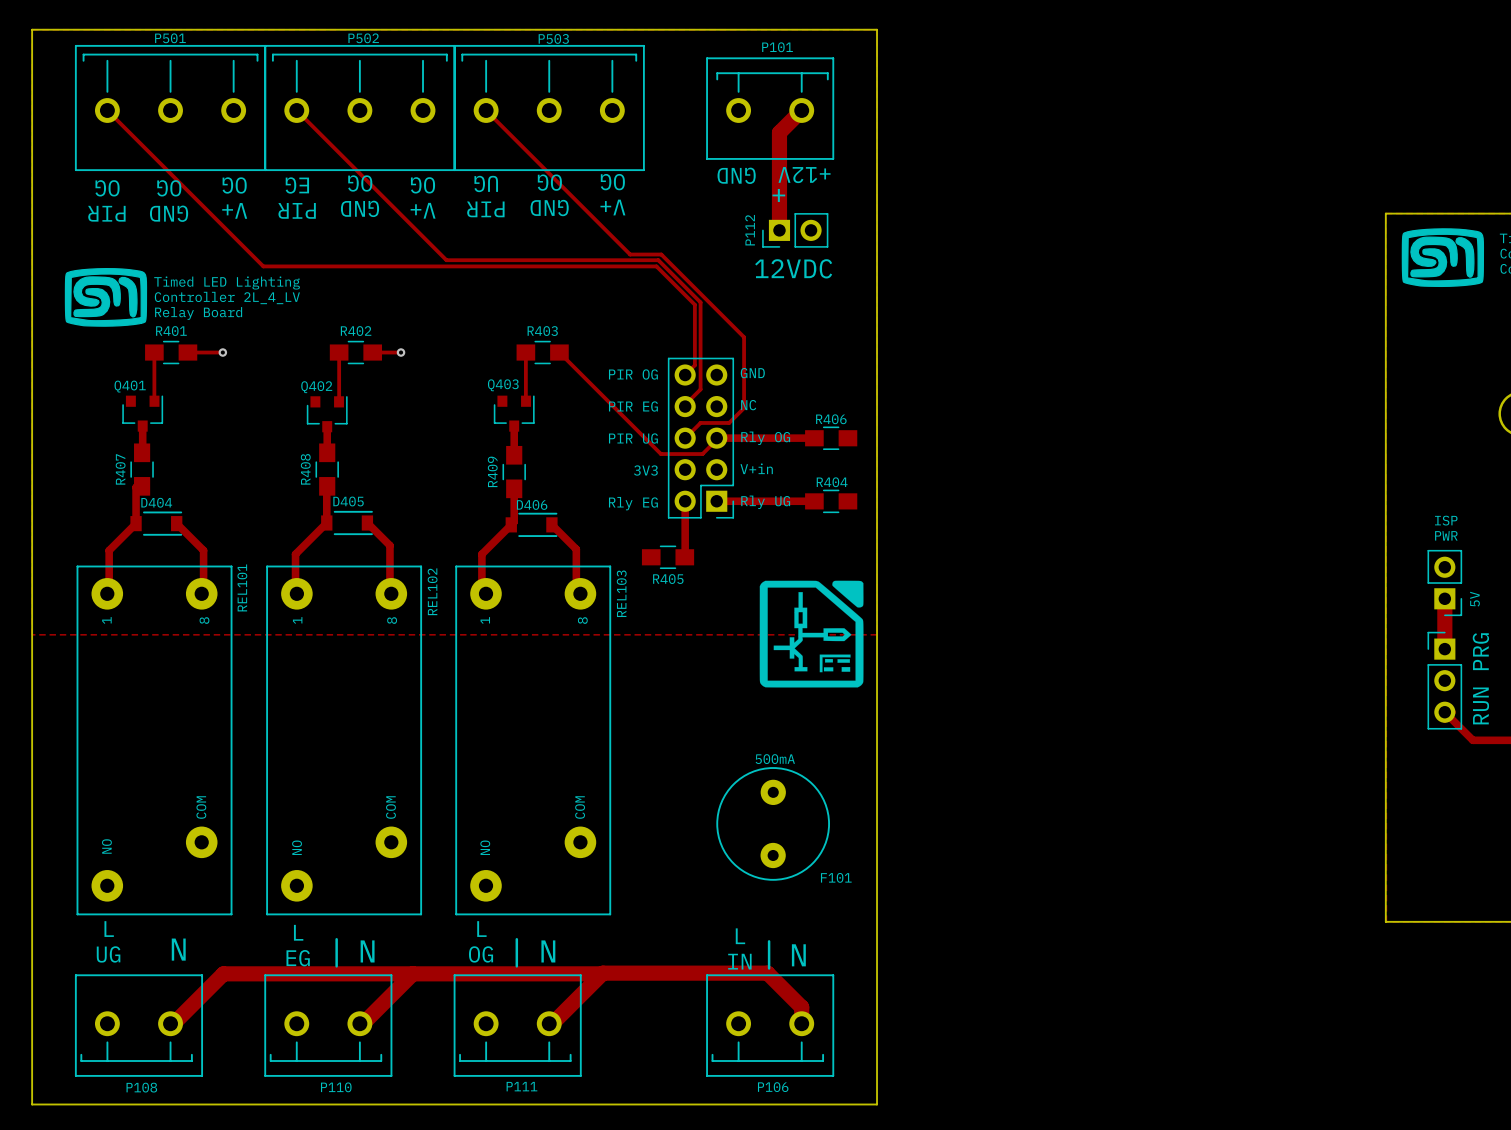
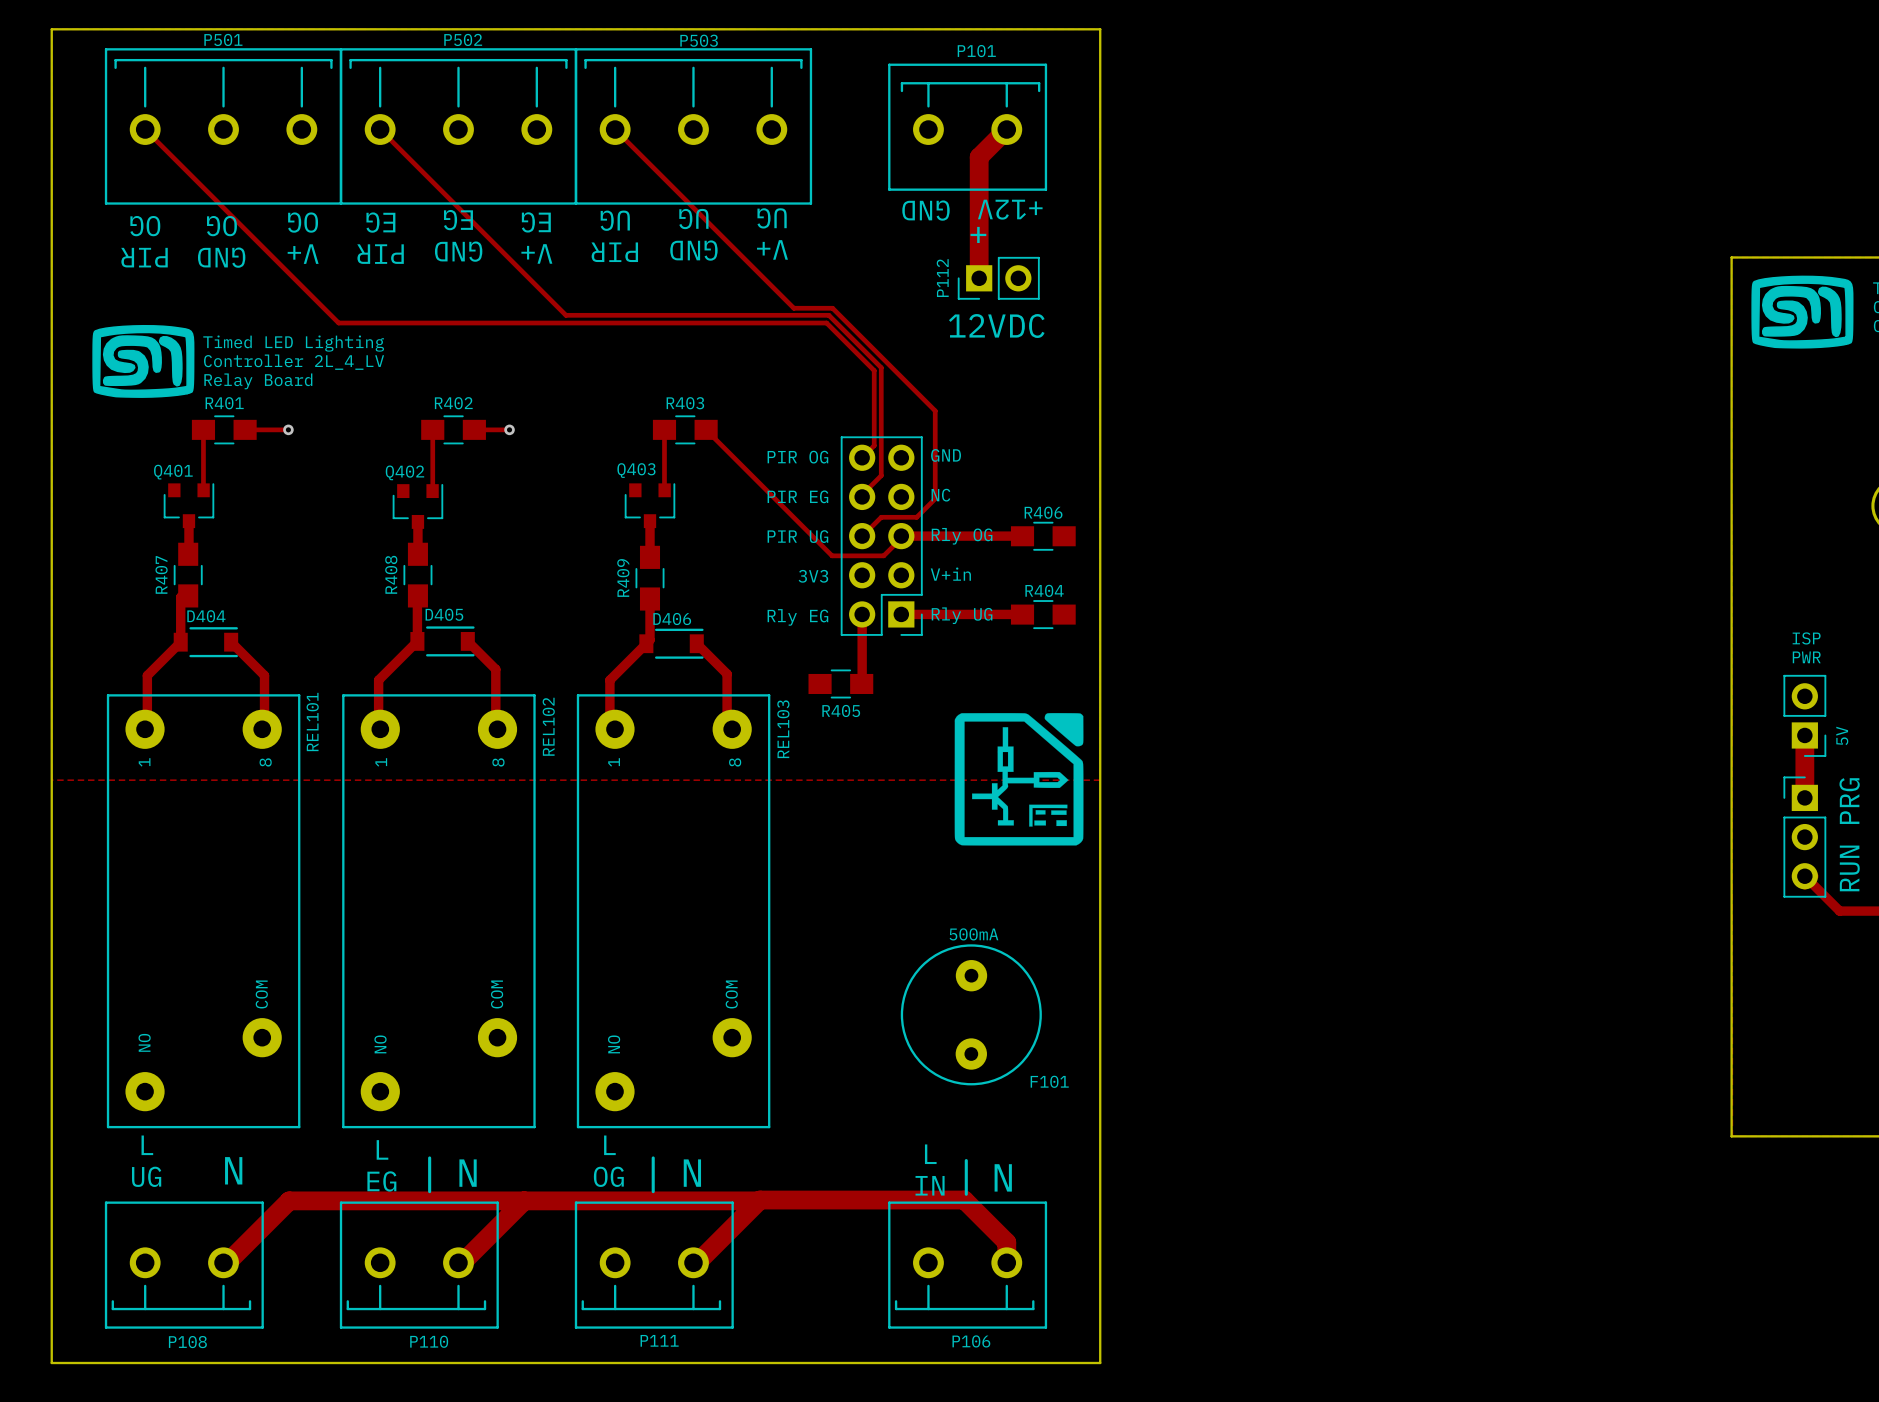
text: OG (549, 182) -> UG (693, 219)
text: OG (612, 182) -> UG (772, 218)
text: OG (360, 183) -> EG (458, 220)
text: OG (423, 185) -> EG (536, 222)

